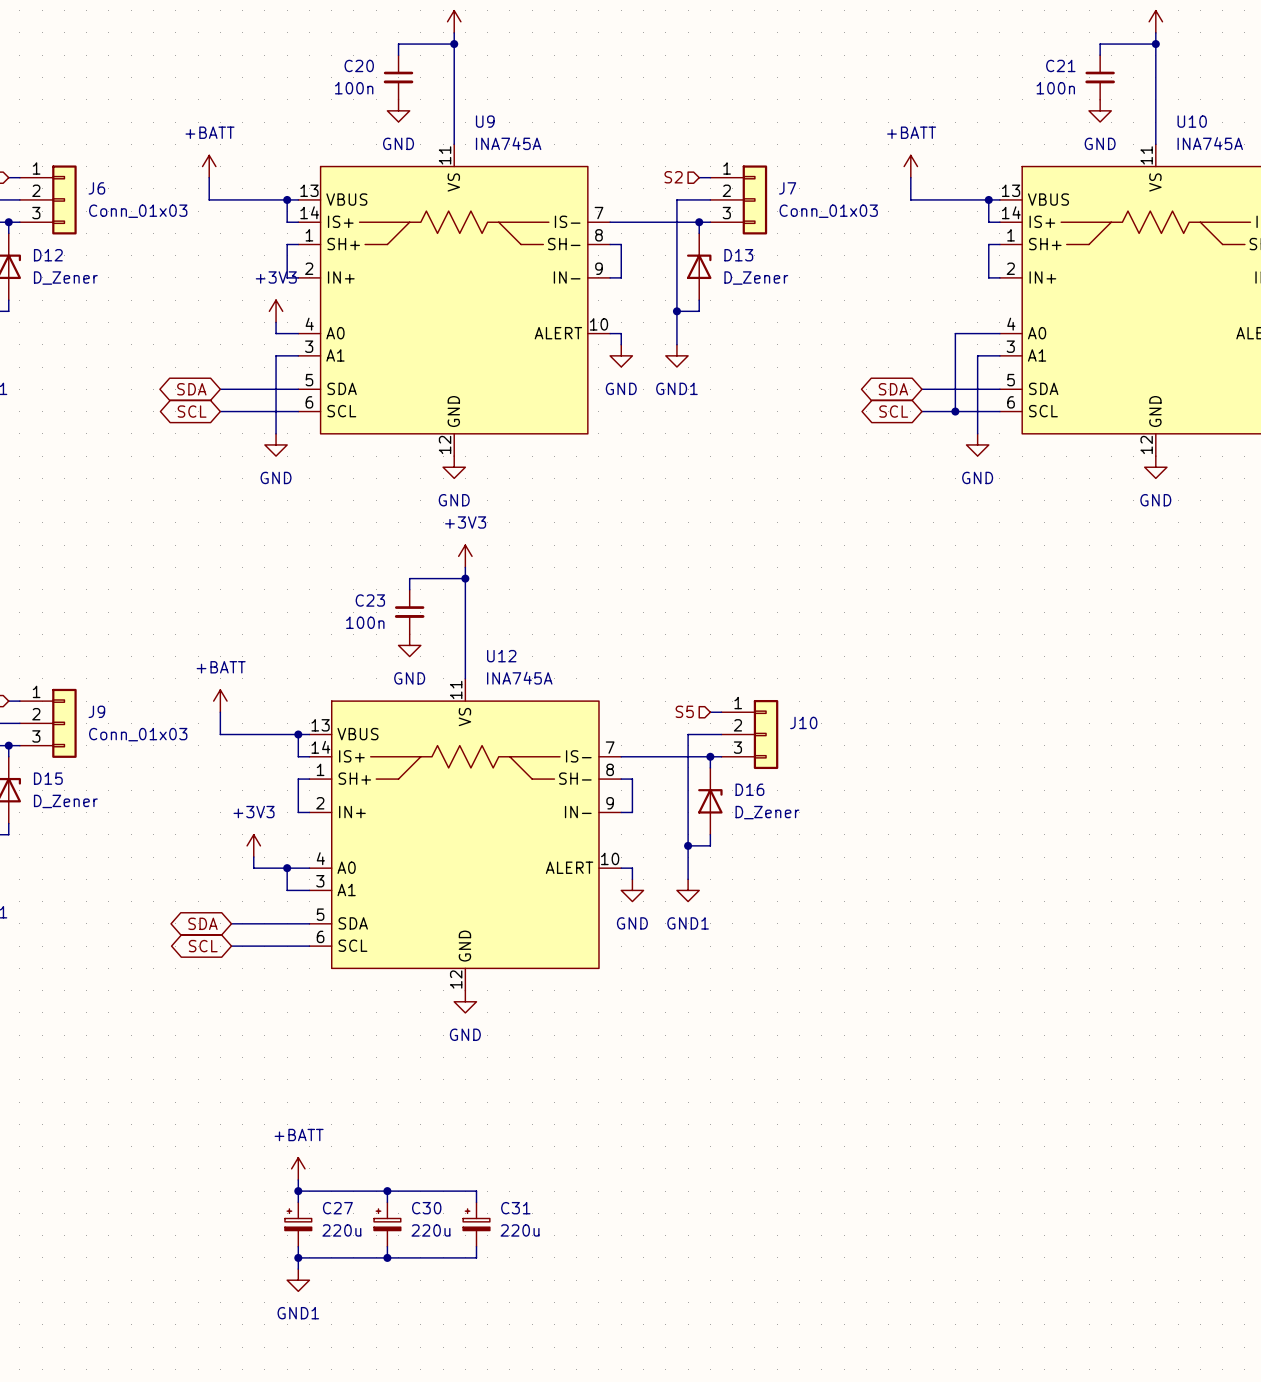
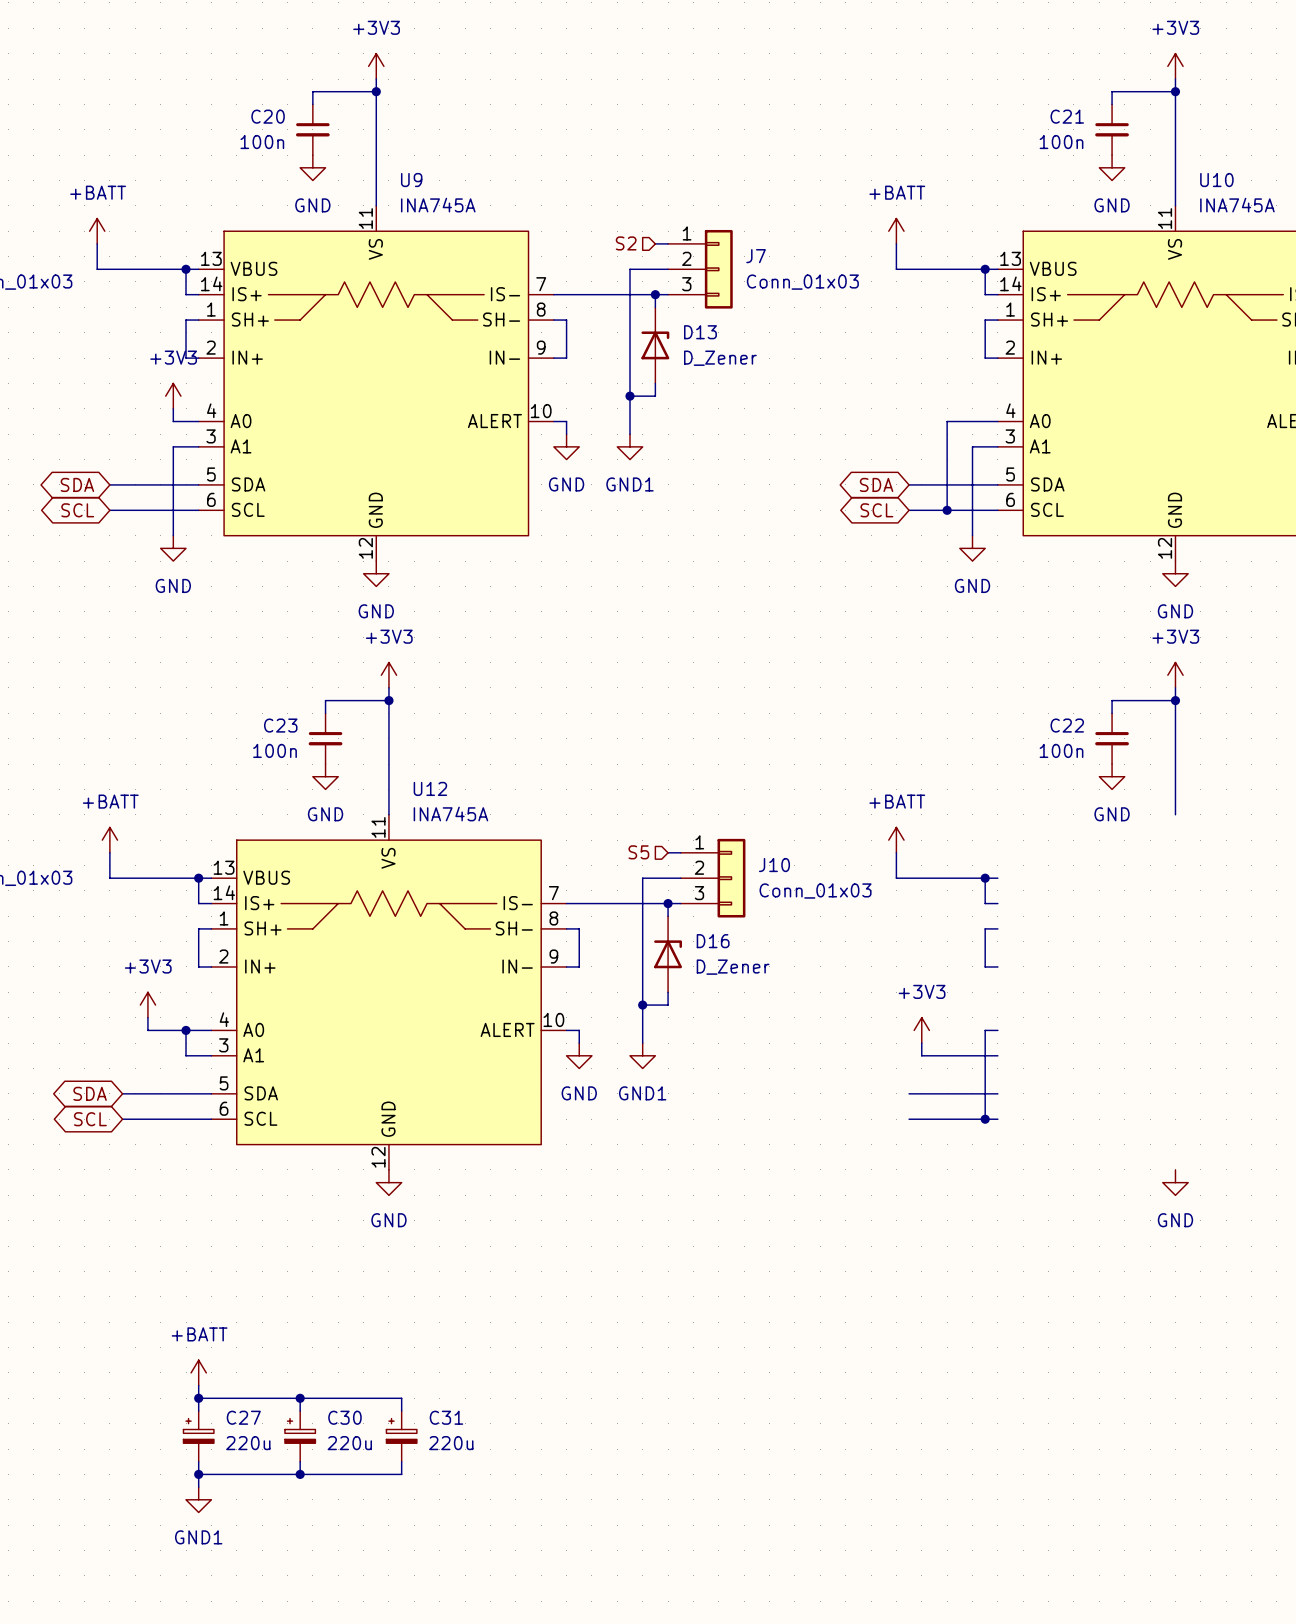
power symbol: none -> +3V3 (1175, 675)
wire: none -> (1175, 687) (1175, 814)
wire: none -> (1175, 700) (1112, 700) (1112, 713)
junction: none -> (1175, 700)
C22: none -> 100n (1112, 738)
power symbol: none -> GND (1112, 776)
power symbol: none -> +BATT (896, 840)
wire: none -> (896, 852) (896, 878) (997, 878)
wire: none -> (985, 878) (985, 903) (997, 903)
junction: none -> (985, 878)
J10 value: none -> Conn_01x03 (815, 891)
wire: none -> (997, 928) (985, 928) (985, 966) (997, 966)
power symbol: none -> +3V3 (921, 1030)
wire: none -> (997, 1030) (985, 1030) (985, 1119)
wire: none -> (921, 1043) (921, 1055) (997, 1055)
wire: none -> (909, 1093) (997, 1093)
wire: none -> (909, 1119) (997, 1119)
junction: none -> (985, 1119)
power symbol: none -> GND (1175, 1182)

